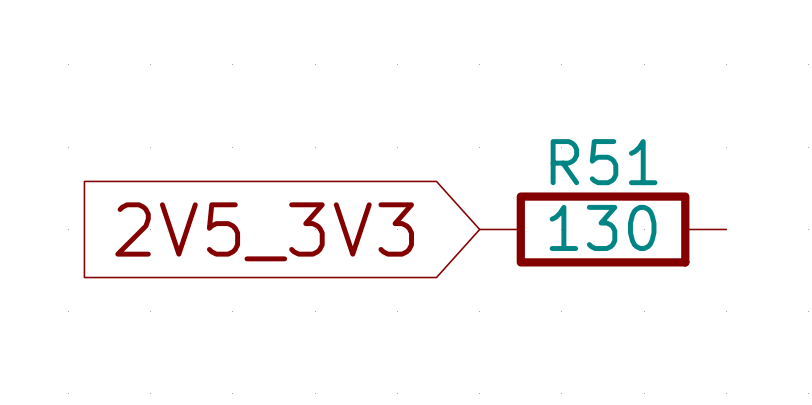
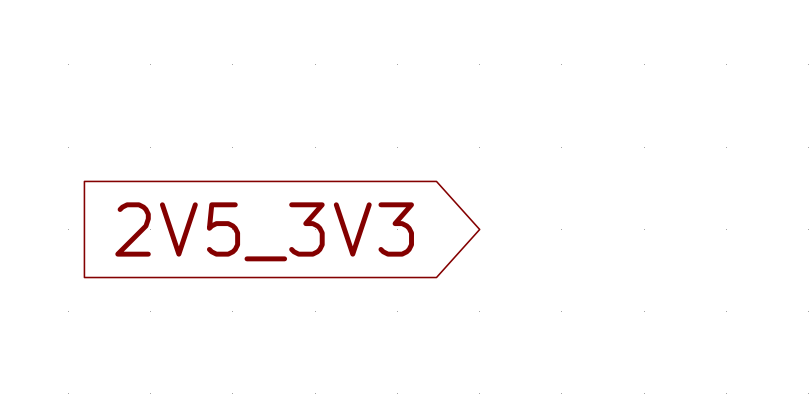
R51: 130 (603, 229) -> none

